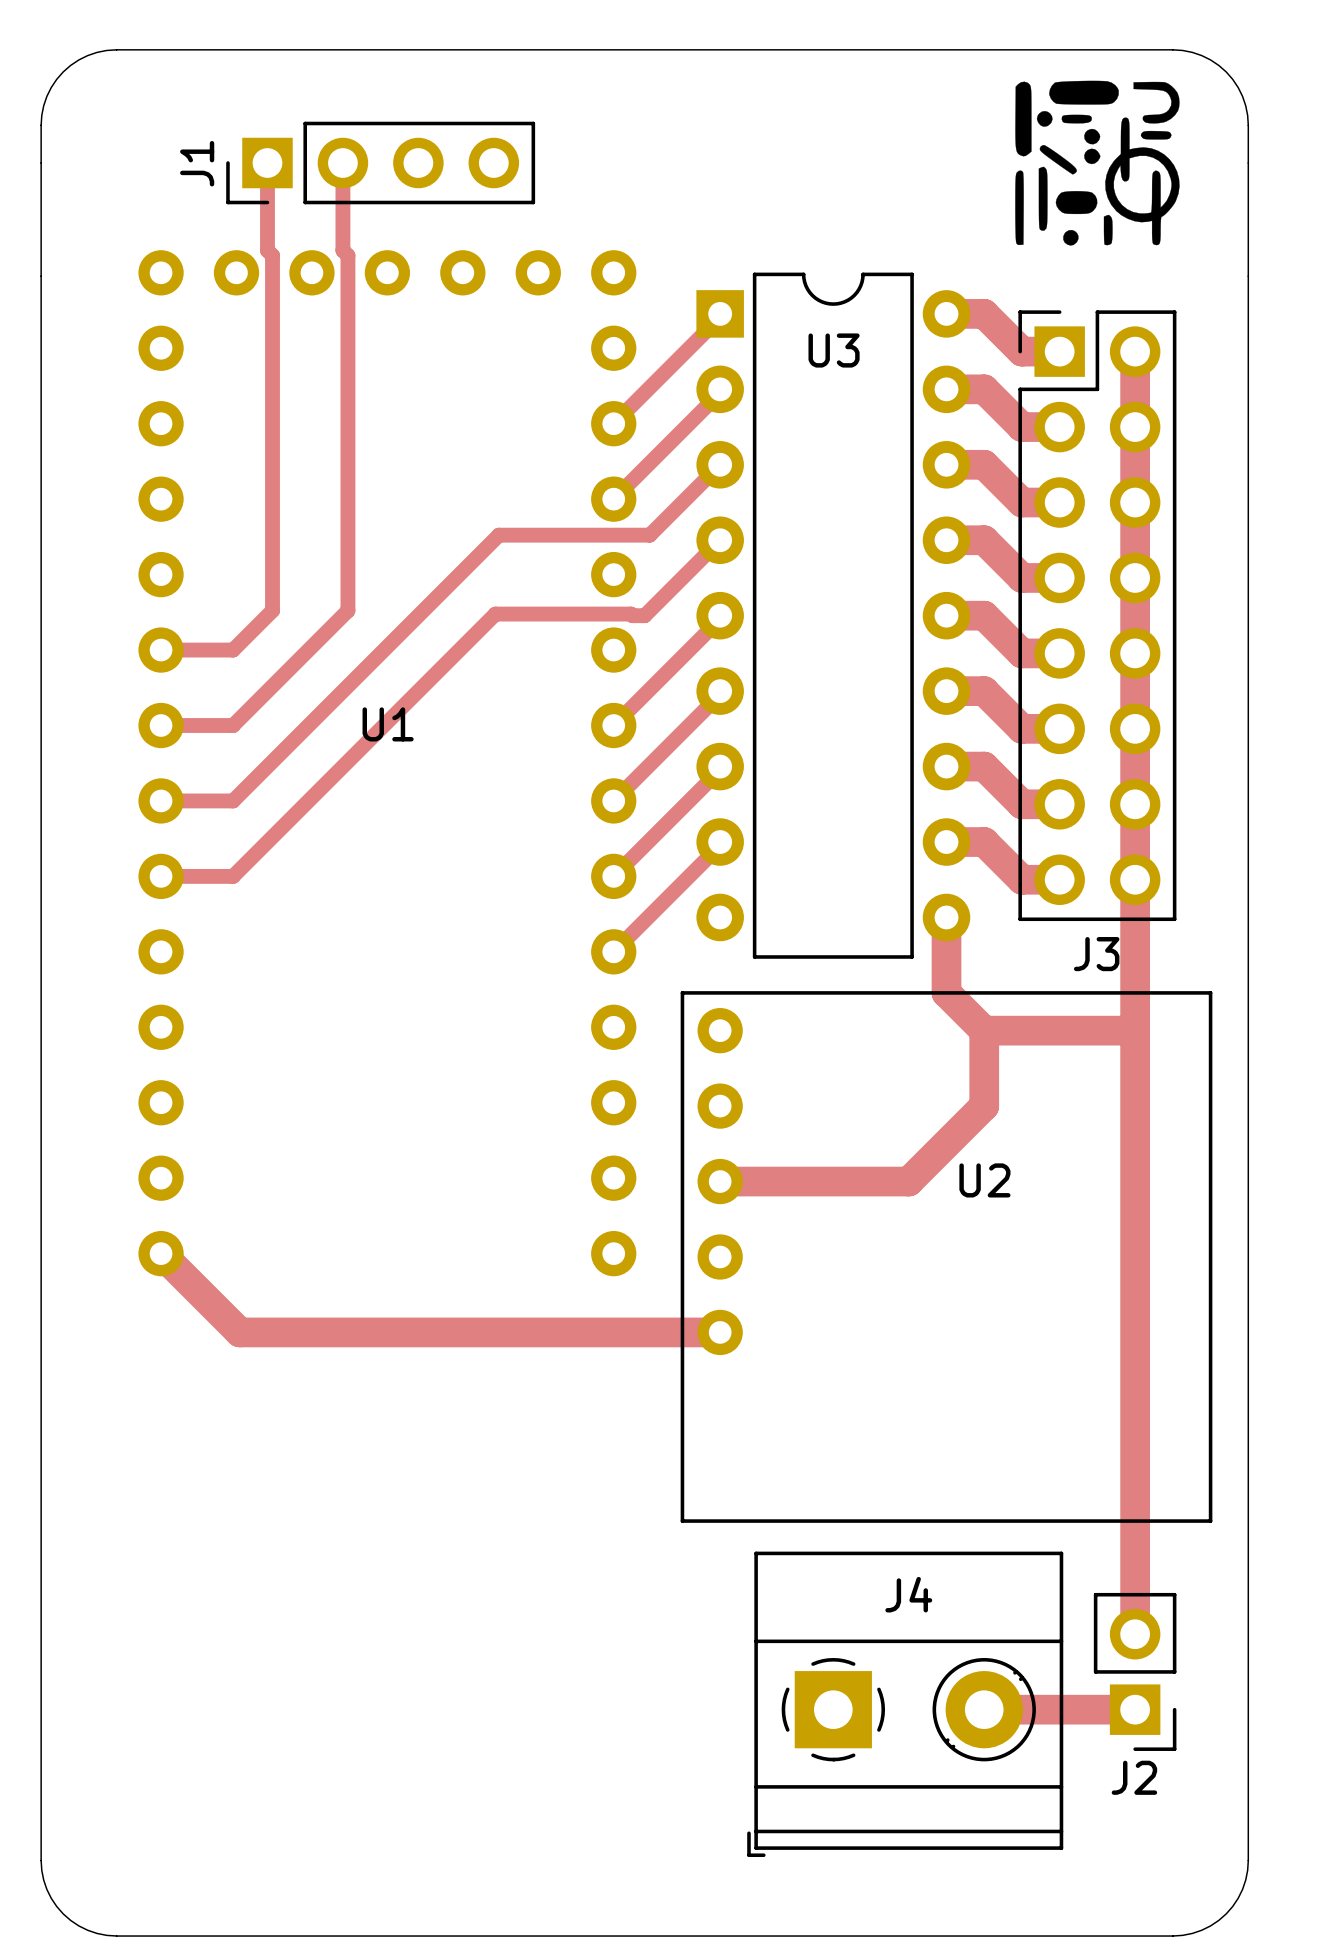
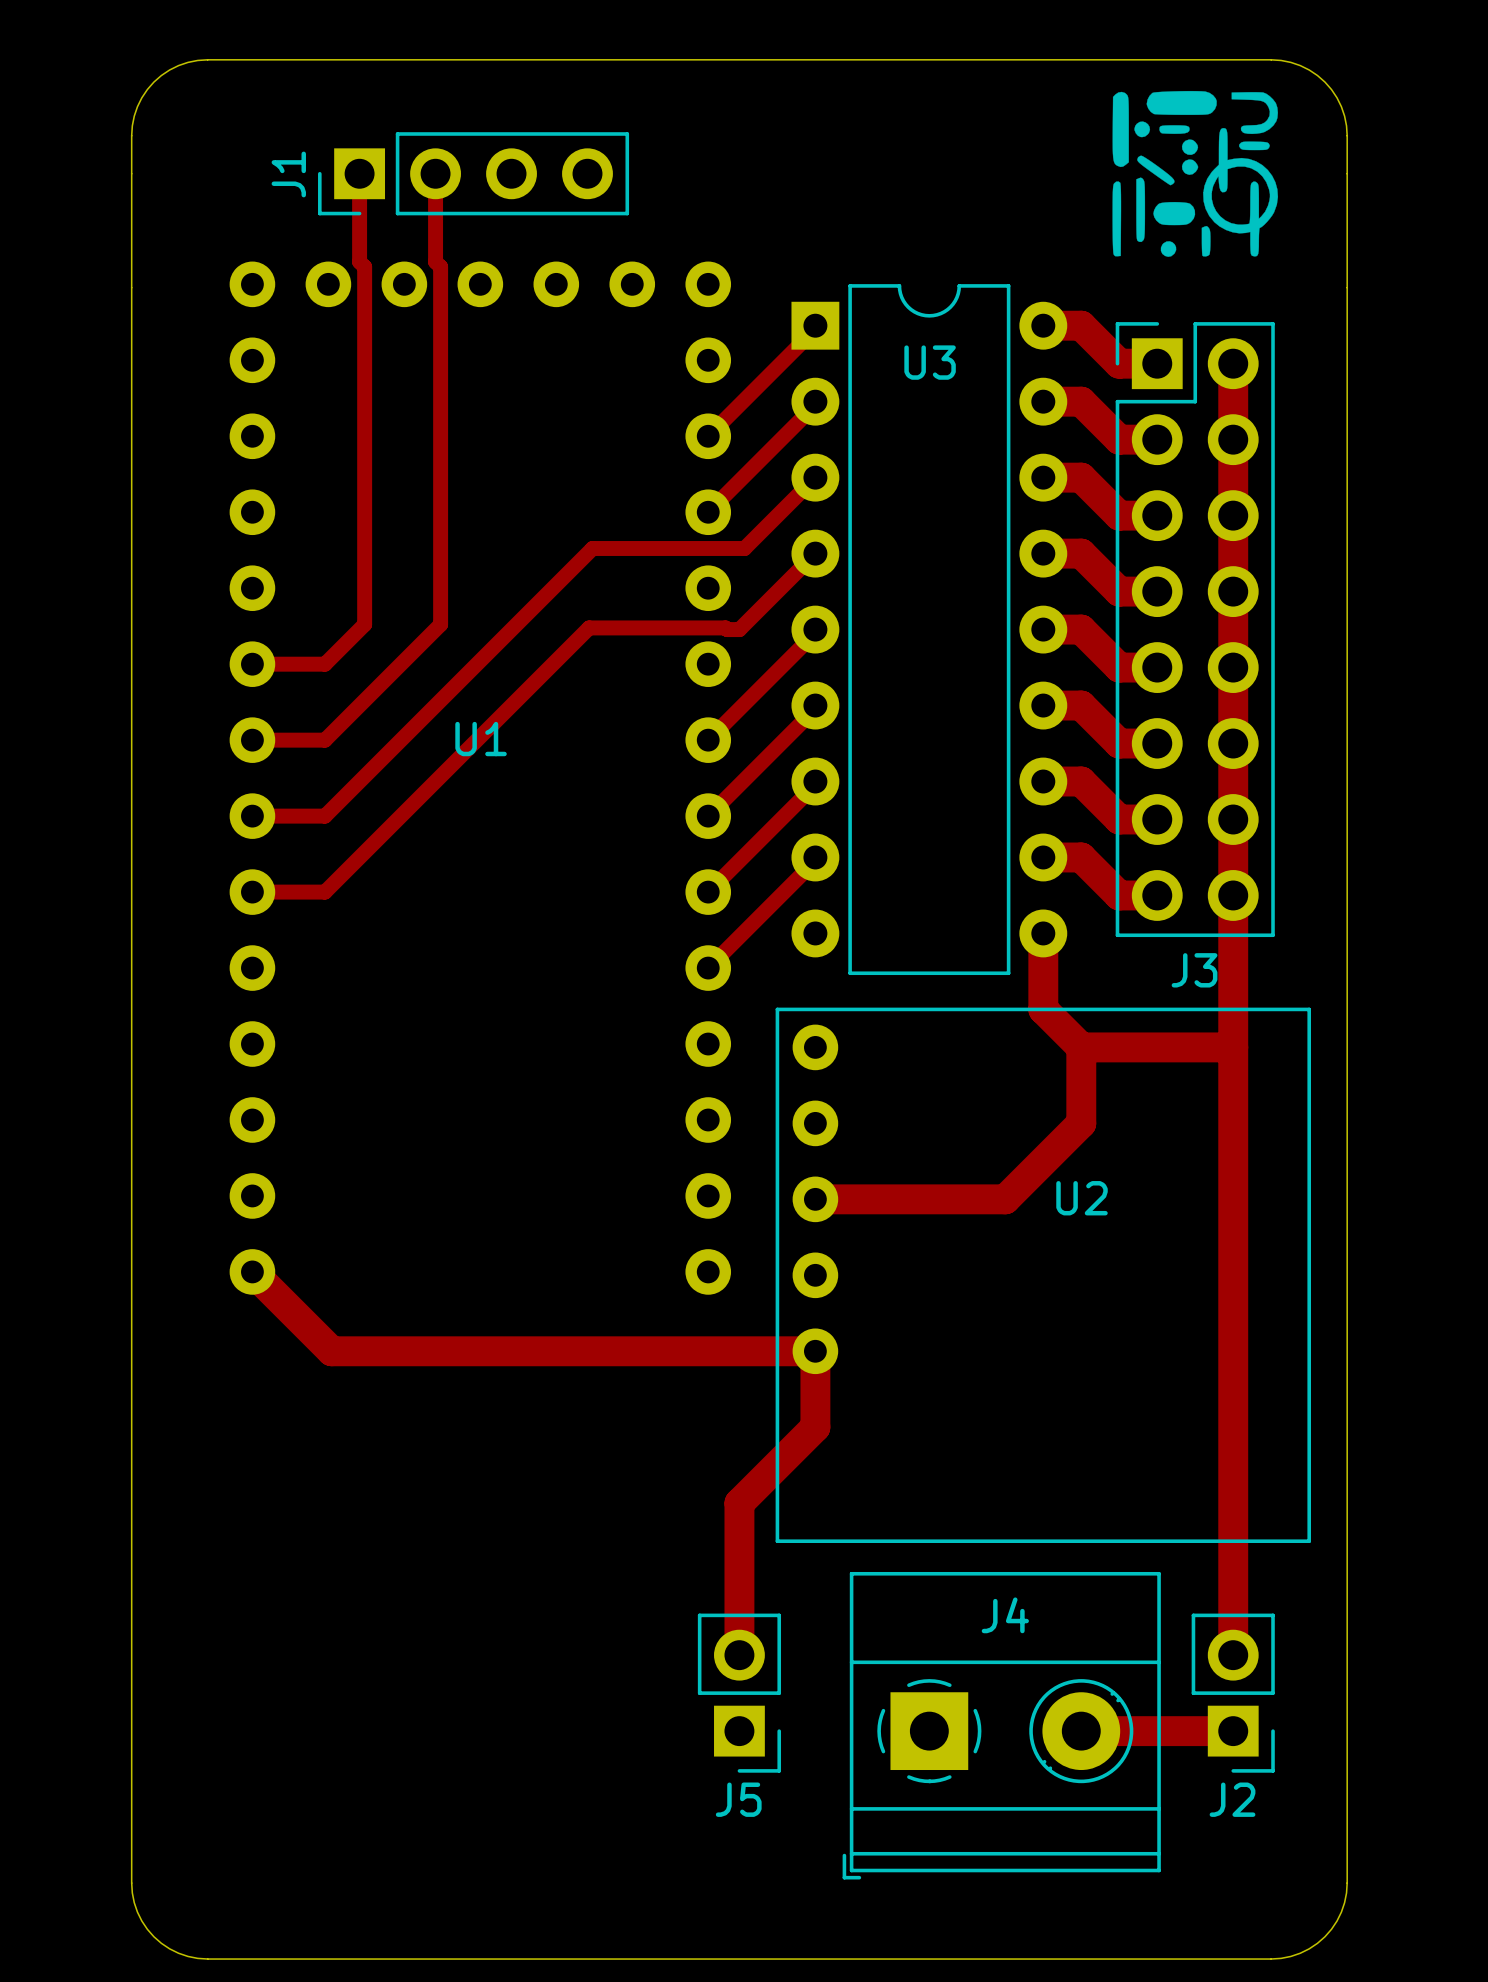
top track: none -> (815, 1351) (815, 1427) (739, 1503) (739, 1655)
J5: none -> (739, 1693)

